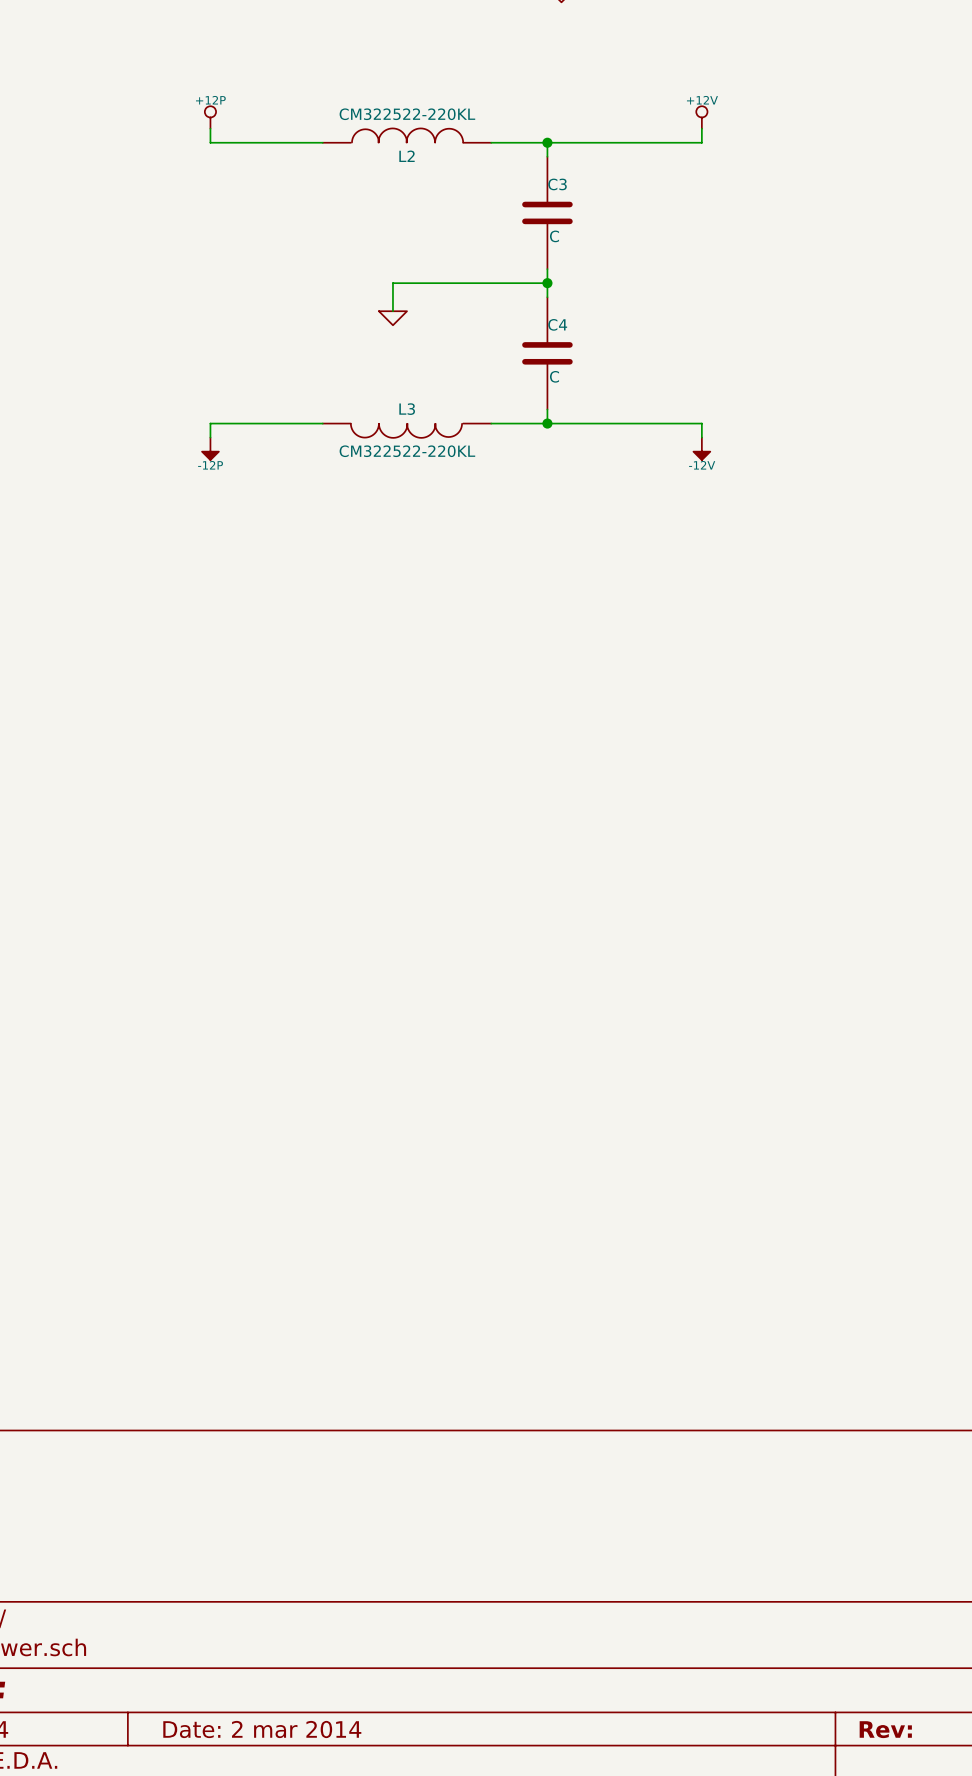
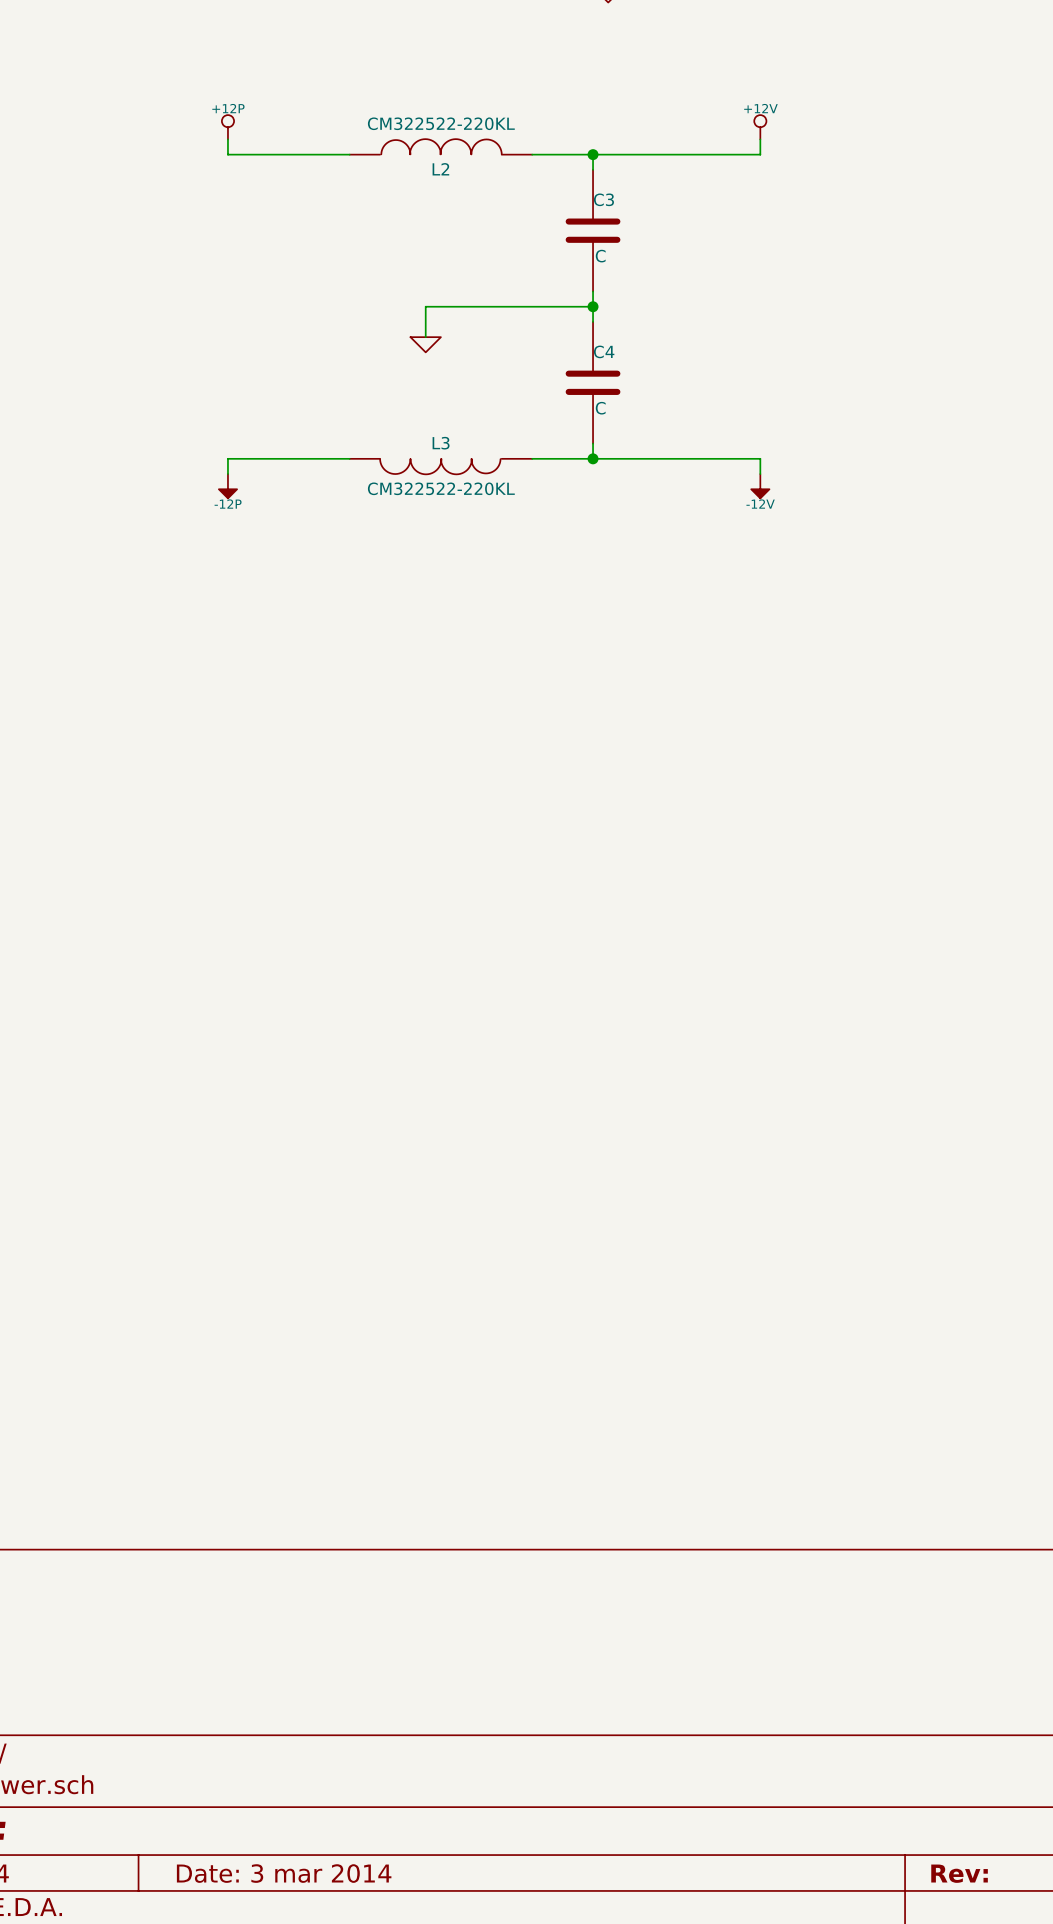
title block: Date: 2 mar 2014 (262, 1729) -> Date: 3 mar 2014 (284, 1873)

